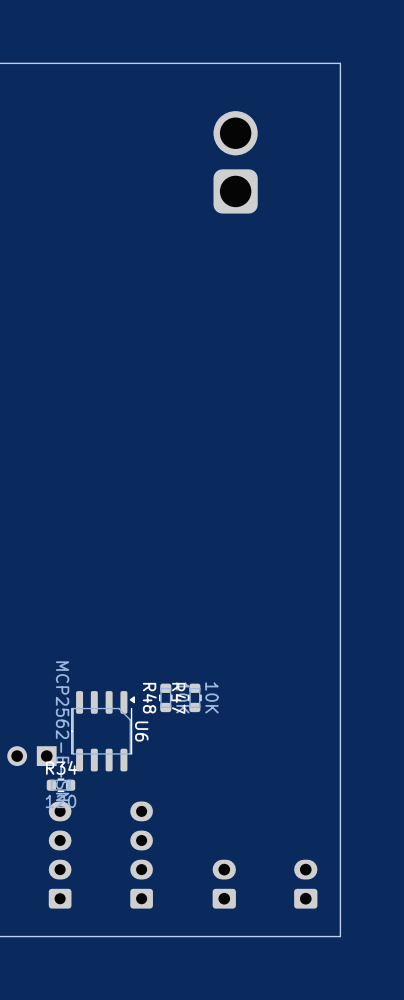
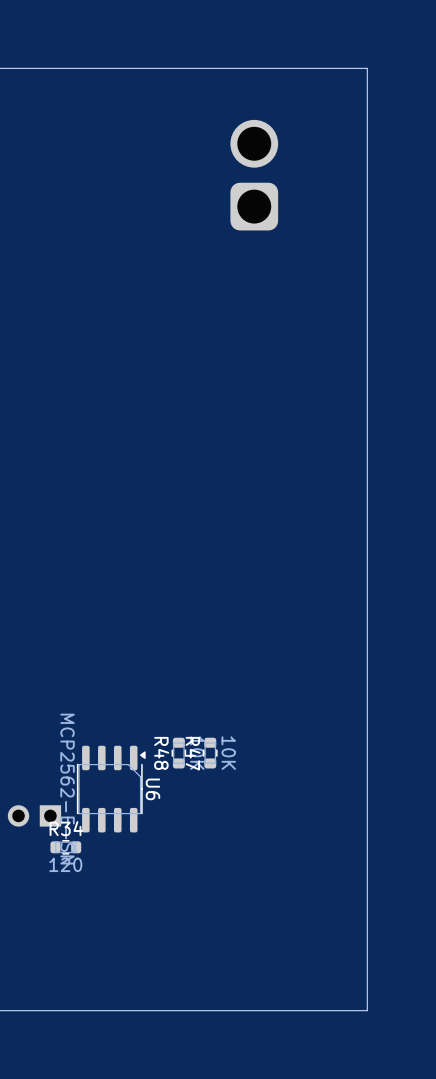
part: (60, 855) -> none
part: (141, 855) -> none
part: (224, 884) -> none
part: (305, 884) -> none

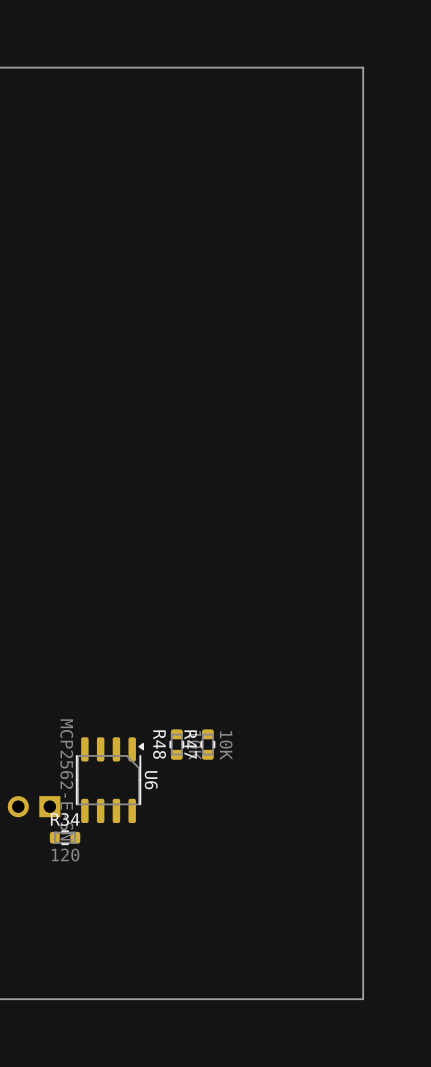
part: (254, 175) -> none

